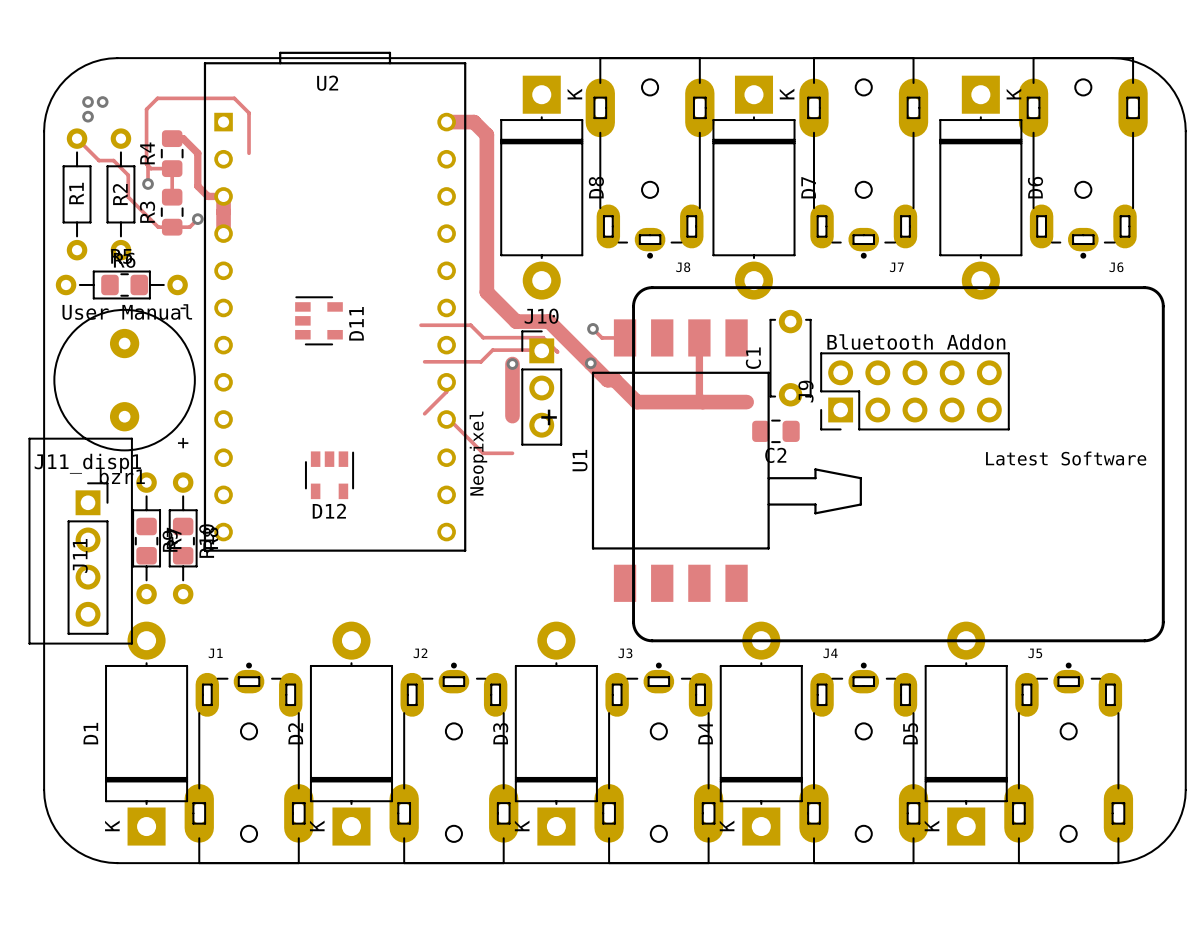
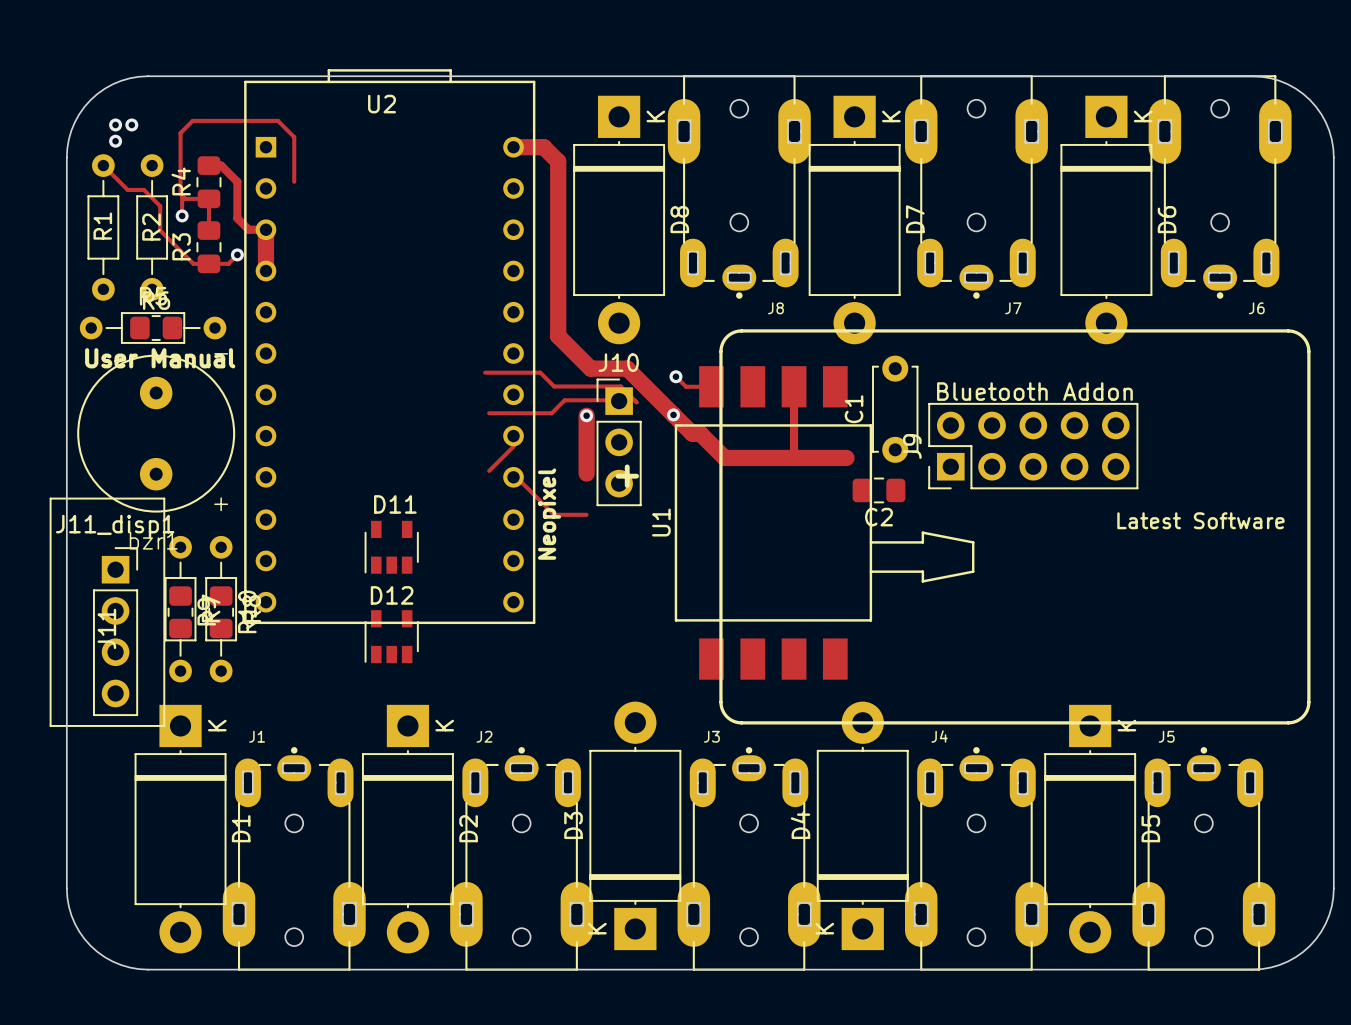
D11 rotation: 0° (318, 320) -> 90° counterclockwise (391, 547)
D11 position: (318, 320) -> (391, 547)
D12 rotation: 0° (329, 475) -> 180° (391, 636)
D12 position: (329, 475) -> (391, 636)
D1 rotation: 0° (146, 733) -> 180° (180, 829)
D2 rotation: 0° (351, 733) -> 180° (407, 829)
D5 rotation: 0° (966, 733) -> 180° (1090, 829)

